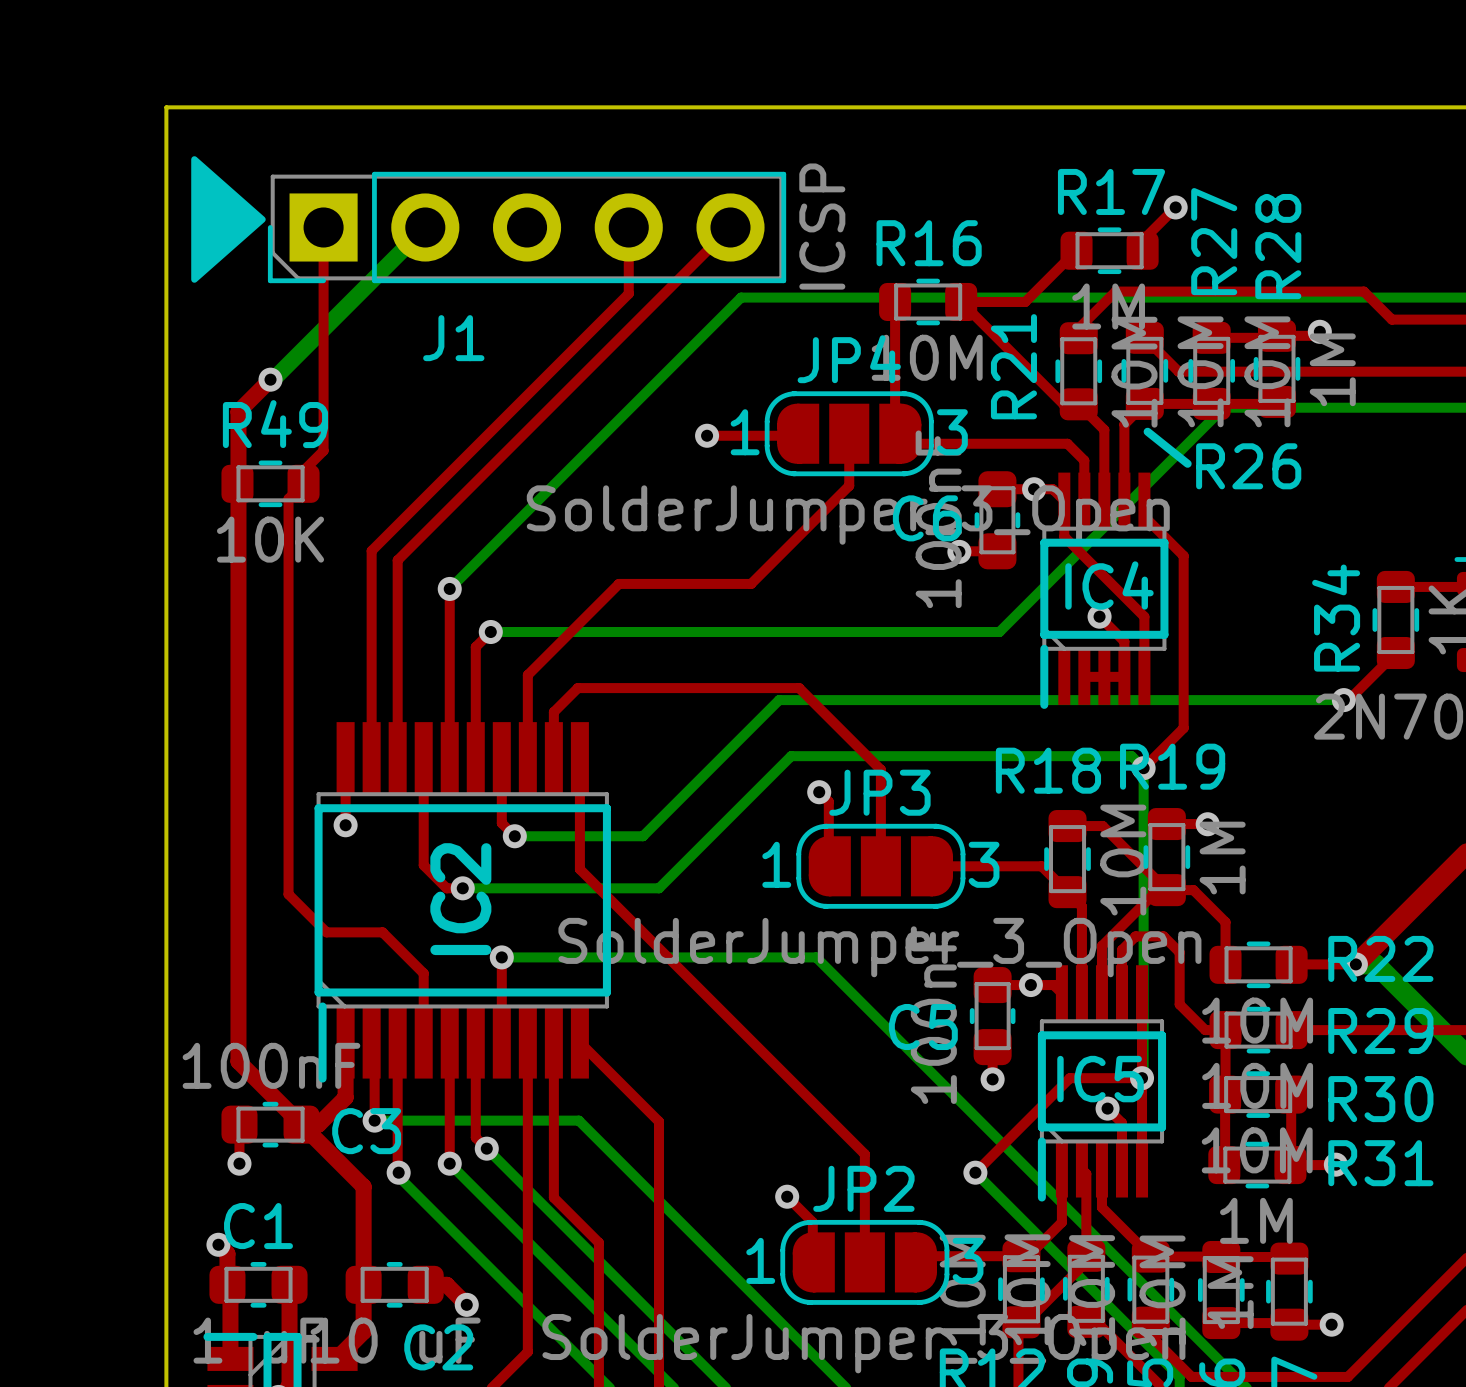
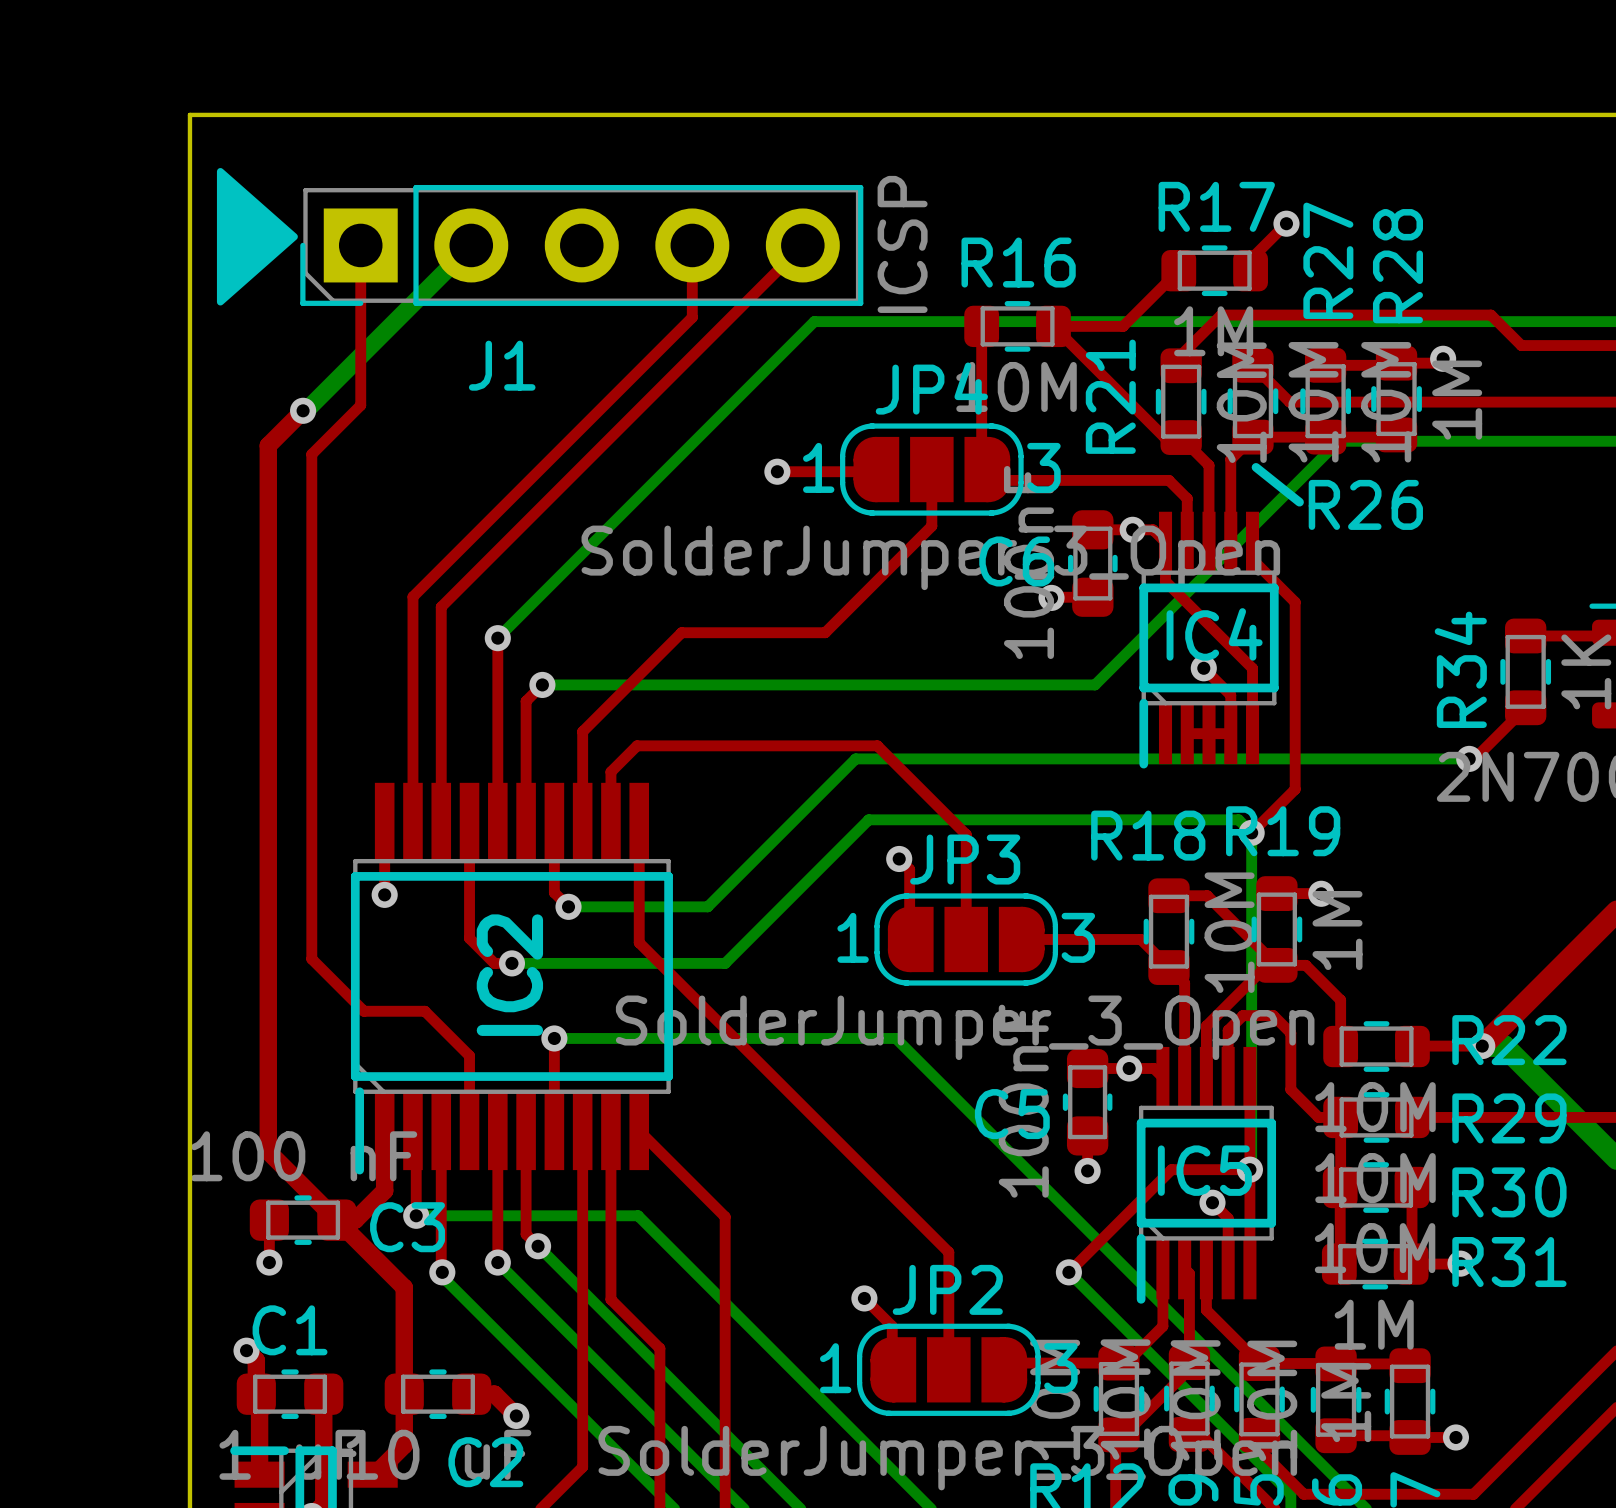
top track: (323, 374) (323, 450) (303, 470) (303, 483) (288, 498) (288, 894) -> (360, 405) (311, 454) (311, 959) (322, 969)
R49: 10K (270, 483) -> none
C3 value: 100nF (271, 1065) -> 100 nF (304, 1156)

